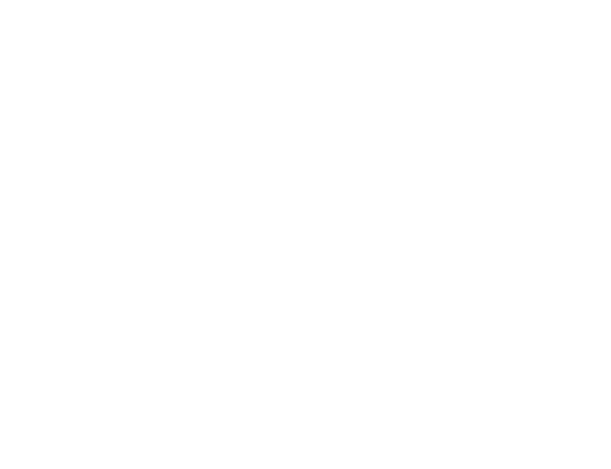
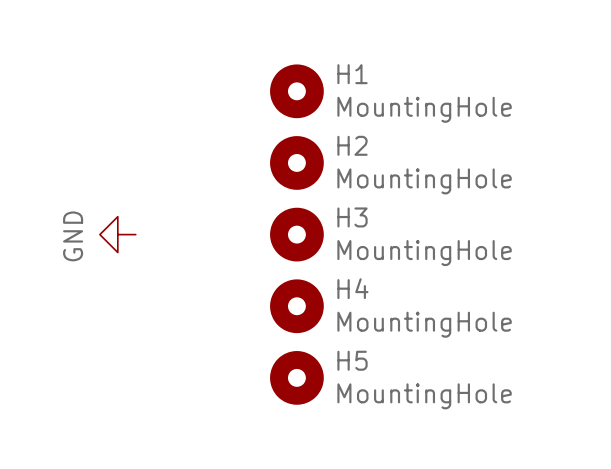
H1: none -> MountingHole (296, 91)
H2: none -> MountingHole (296, 162)
power symbol: none -> GND (117, 234)
H3: none -> MountingHole (296, 234)
H4: none -> MountingHole (296, 306)
H5: none -> MountingHole (296, 377)

